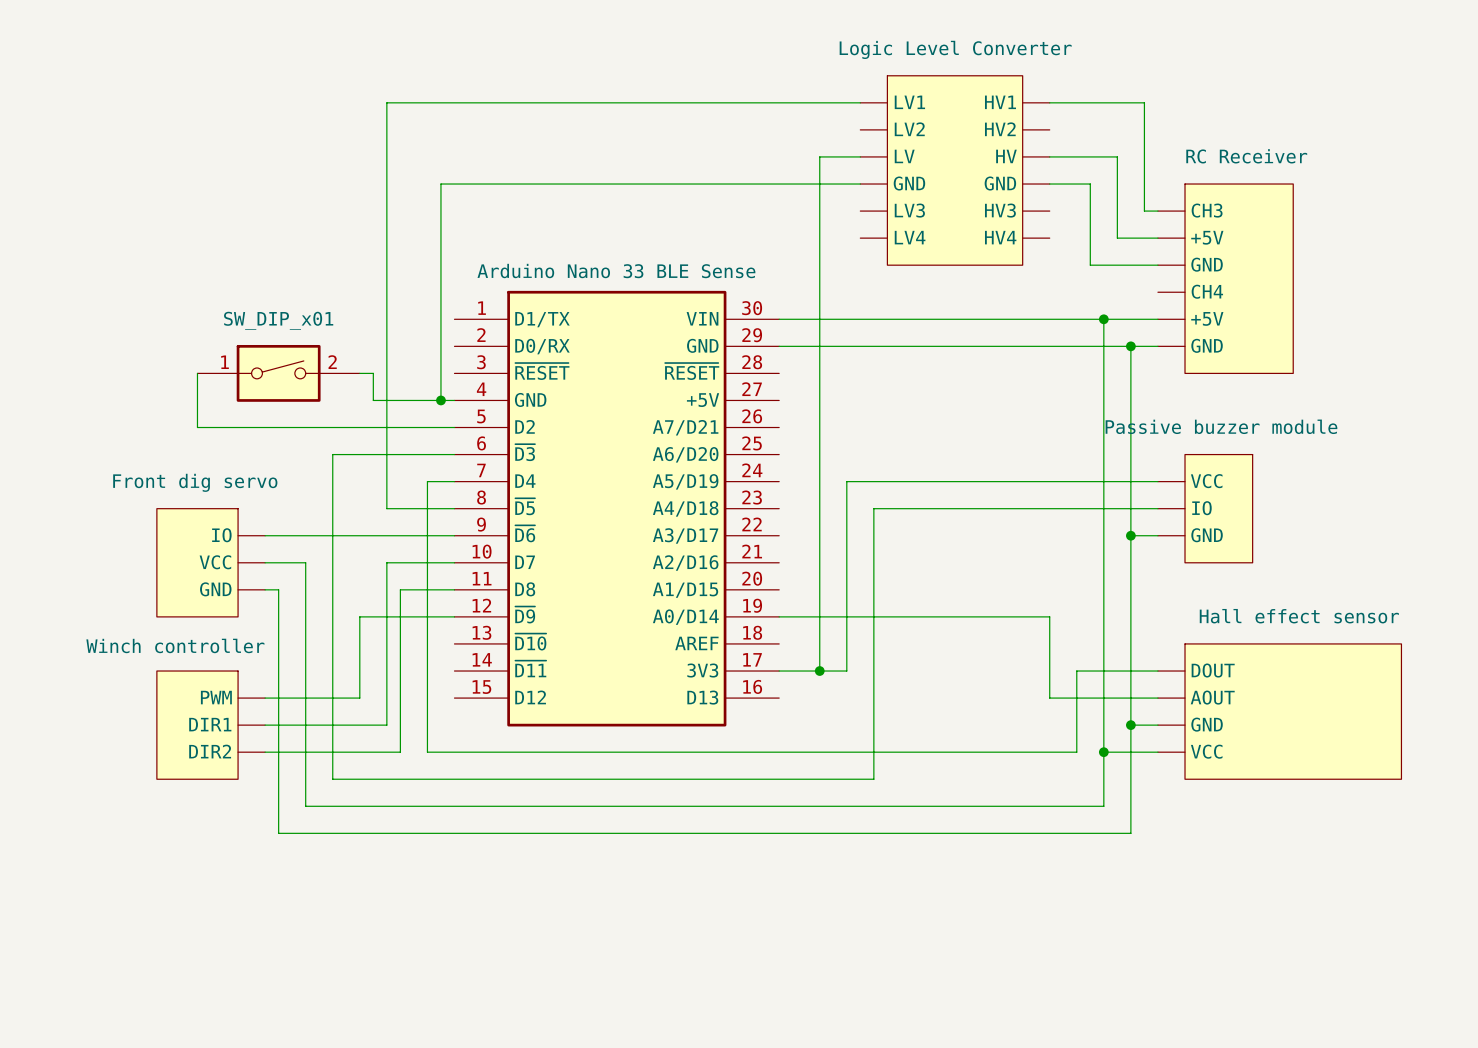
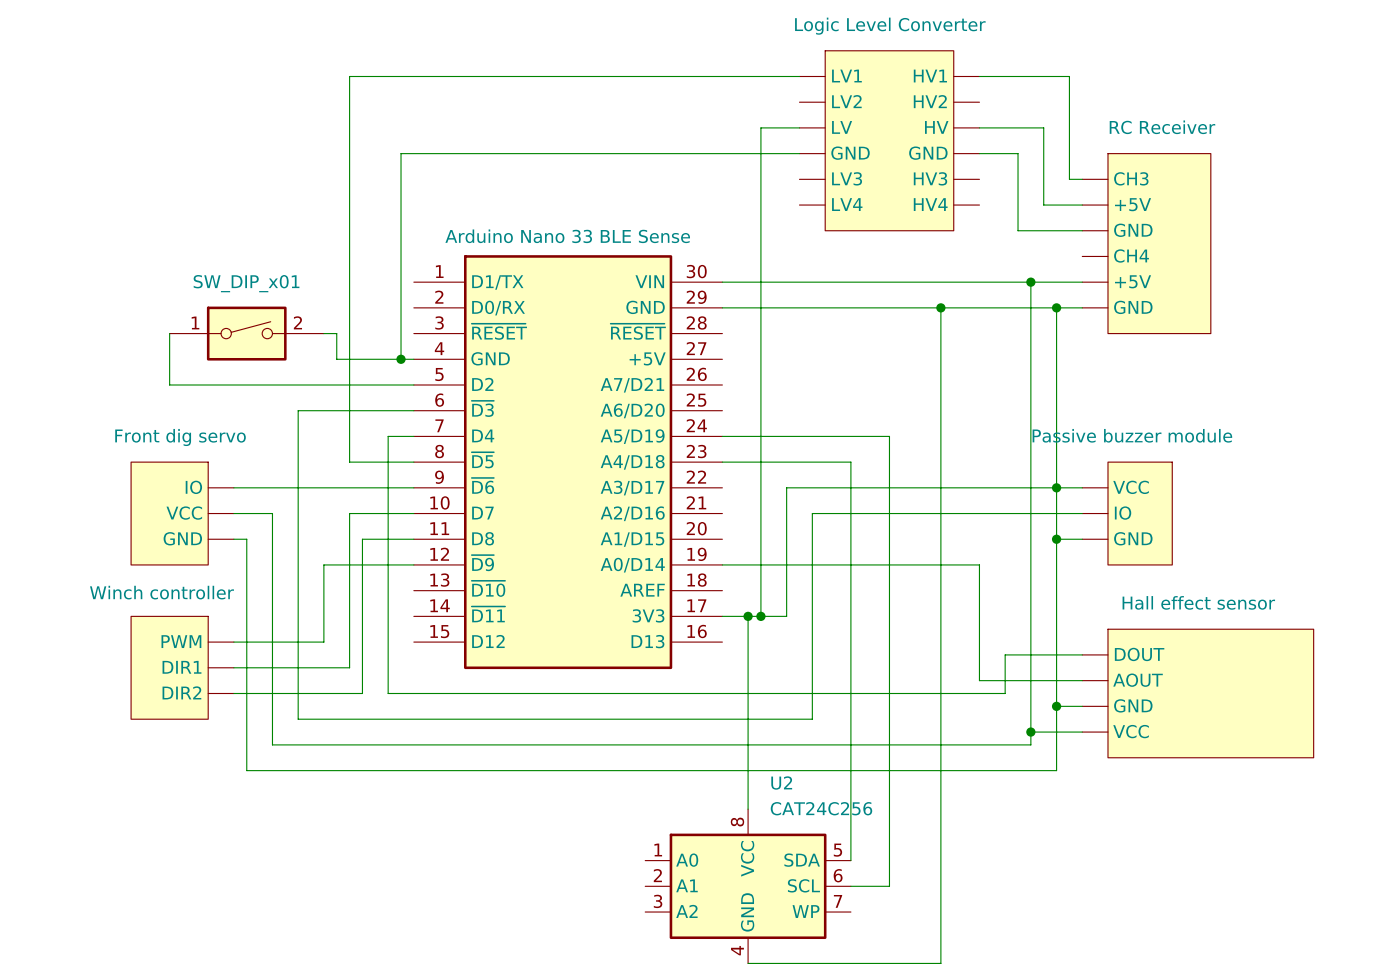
wire: none -> (940, 307) (940, 963) (748, 963)
junction: none -> (940, 307)
wire: (846, 481) (846, 535) -> (786, 436) (722, 436)
wire: (955, 481) (1157, 481) -> (889, 436) (889, 886) (850, 886)
wire: (873, 508) (873, 562) -> (812, 462) (722, 462)
wire: (914, 508) (1157, 508) -> (850, 462) (850, 860)
part position: (1205, 508) -> (1127, 513)
wire: none -> (786, 487) (1056, 487)
wire: none -> (812, 513) (1082, 513)
wire: none -> (1056, 539) (1082, 539)
junction: none -> (1056, 539)
wire: none -> (748, 616) (748, 809)
junction: none -> (748, 616)
wire: (1157, 671) (1076, 671) (1076, 711) -> (1082, 654) (1005, 654)
wire: (1049, 698) (1157, 698) -> (979, 642) (979, 680) (1082, 680)
part position: (1279, 711) -> (1197, 693)
wire: (1130, 725) (1157, 725) -> (1056, 706) (1082, 706)
junction: (1130, 725) -> none
wire: (1103, 752) (1157, 752) -> (1030, 732) (1082, 732)
junction: (1103, 752) -> none
junction: none -> (1056, 706)
junction: none -> (1030, 732)
U2: none -> CAT24C256 (748, 886)

